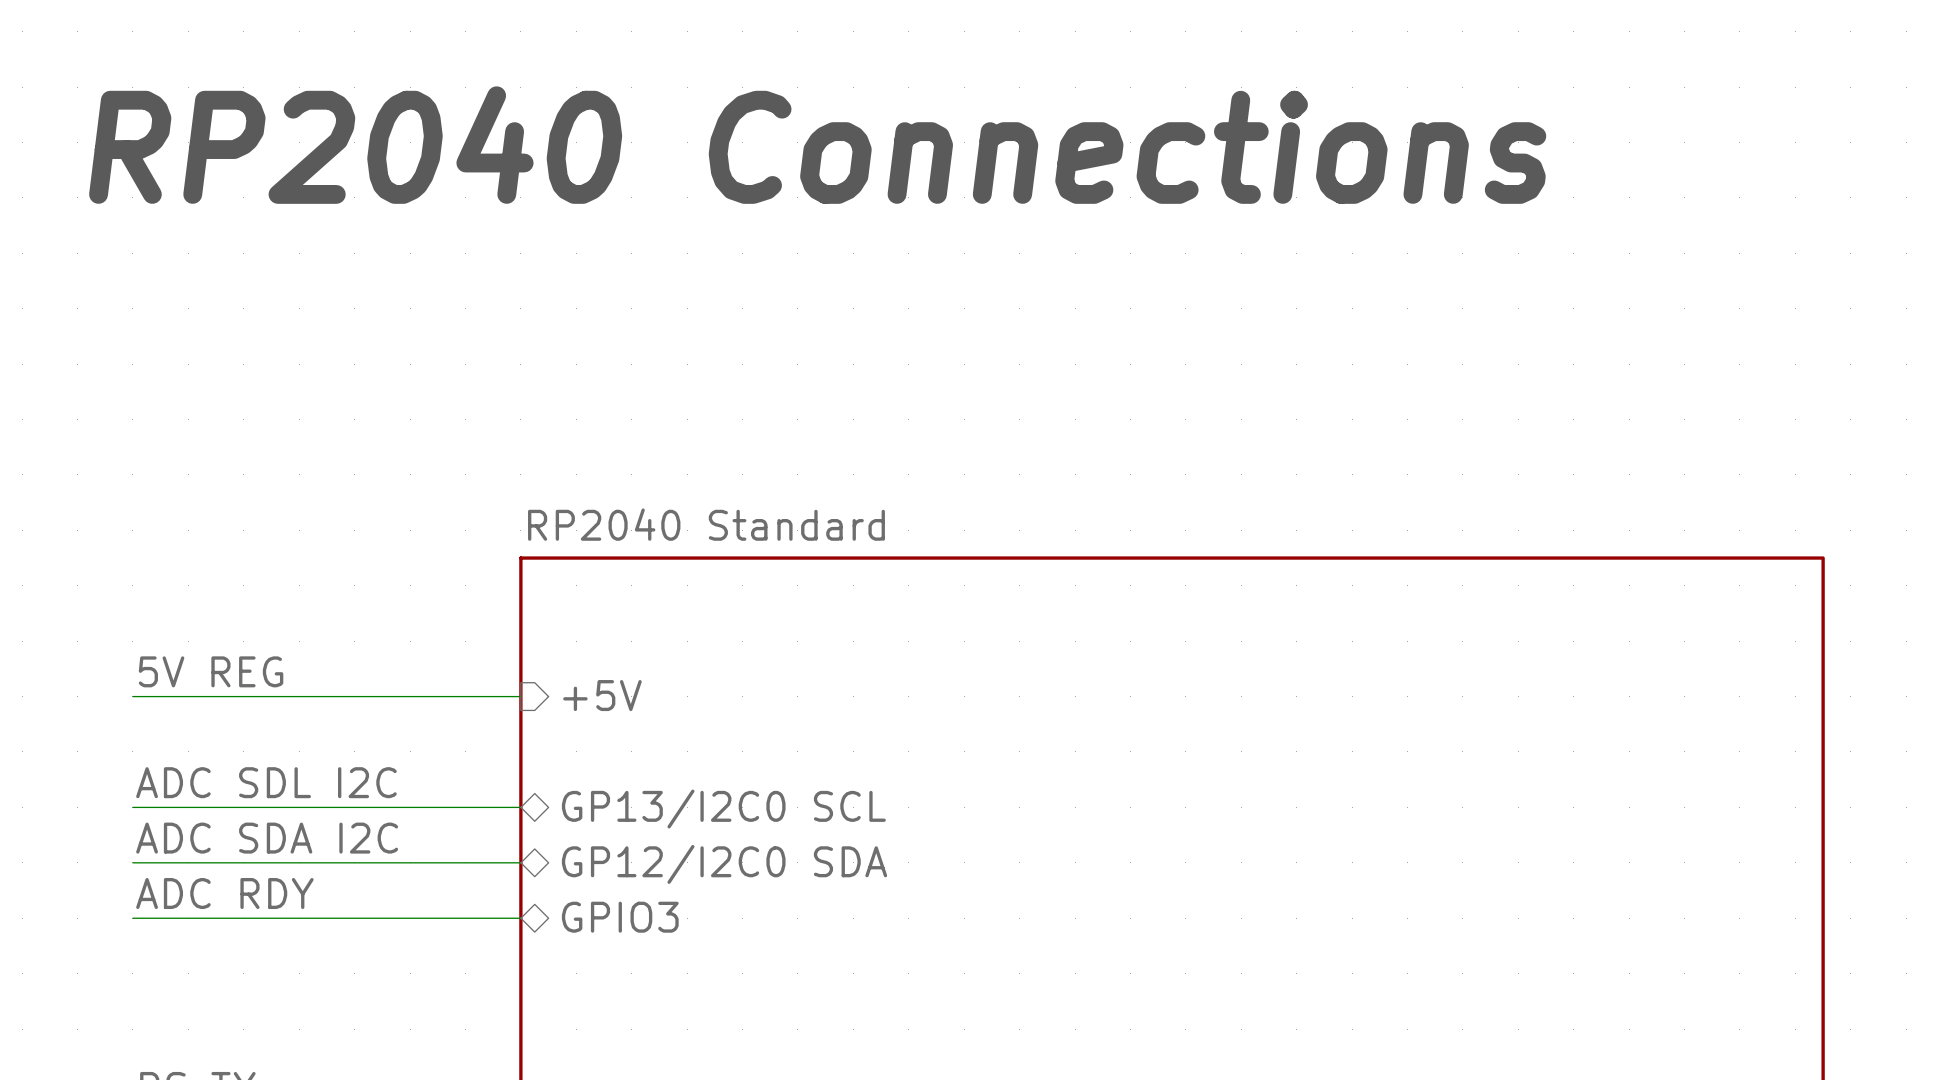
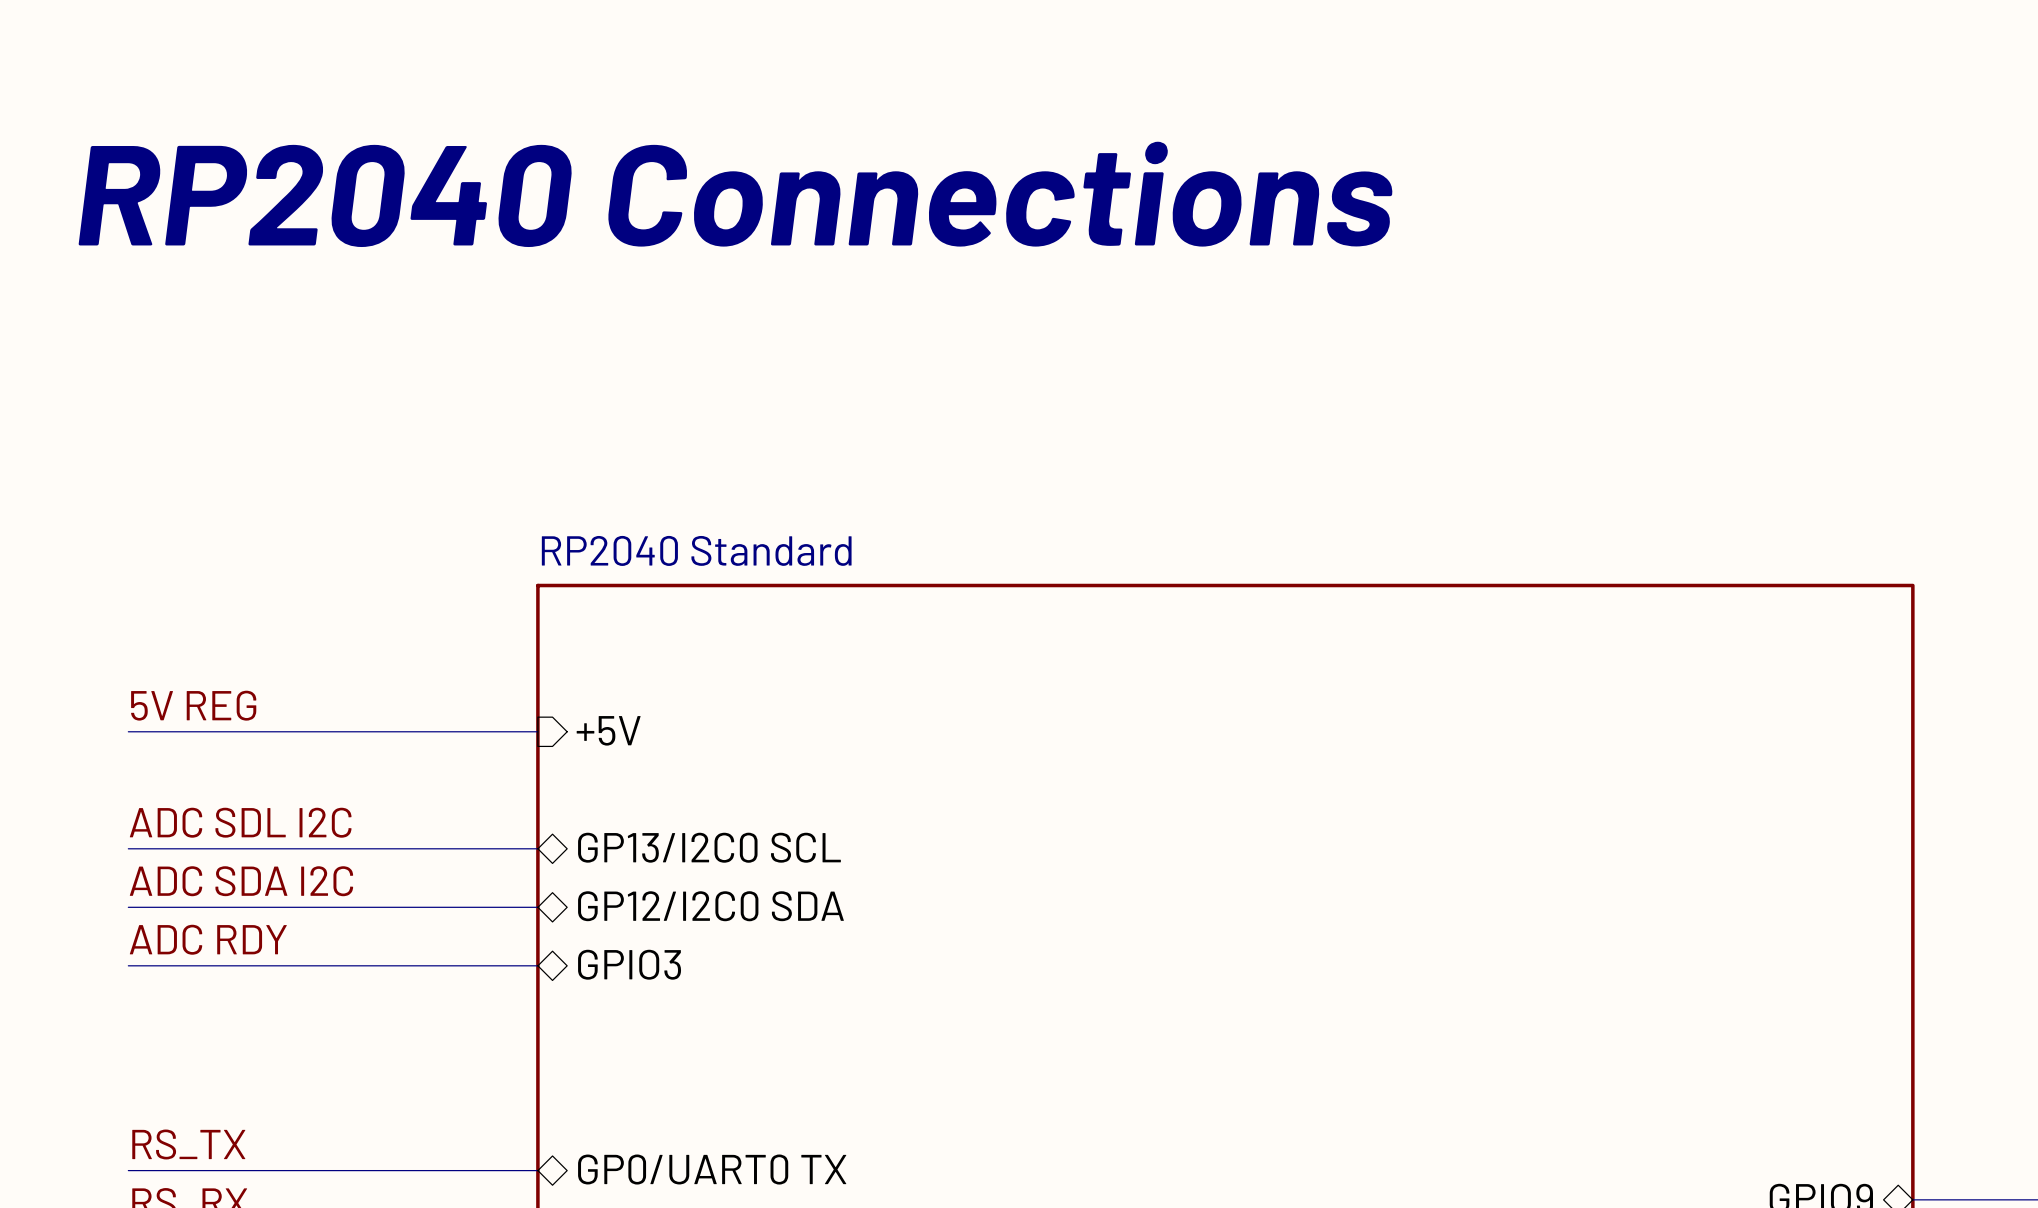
text position: RP2040 Connections (817, 145) -> RP2040 Connections (735, 194)

